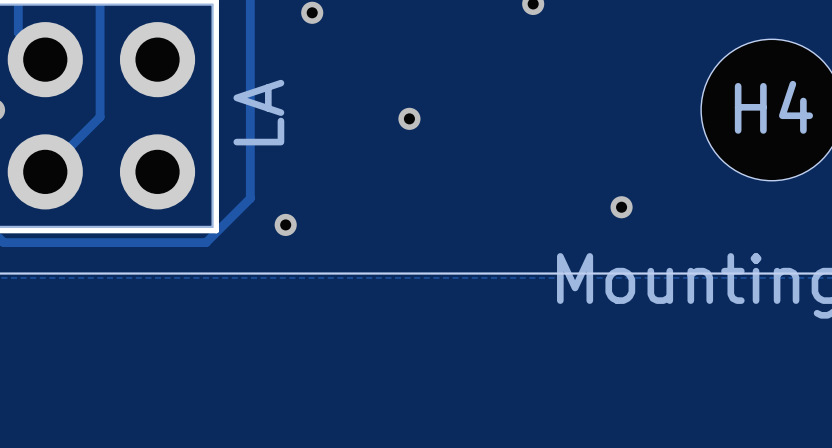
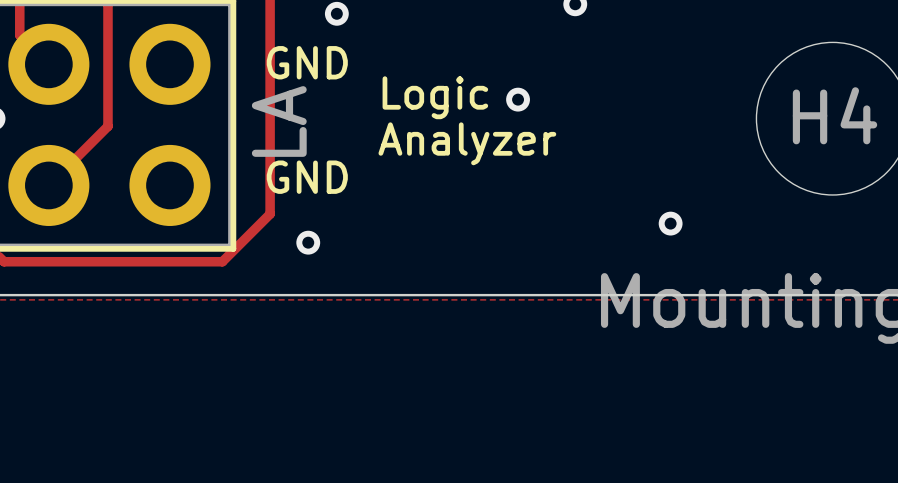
text: none -> GND (307, 62)
text: none -> Logic (435, 97)
via position: (409, 118) -> (518, 99)
text: none -> Analyzer (467, 143)
text: none -> GND (307, 177)

